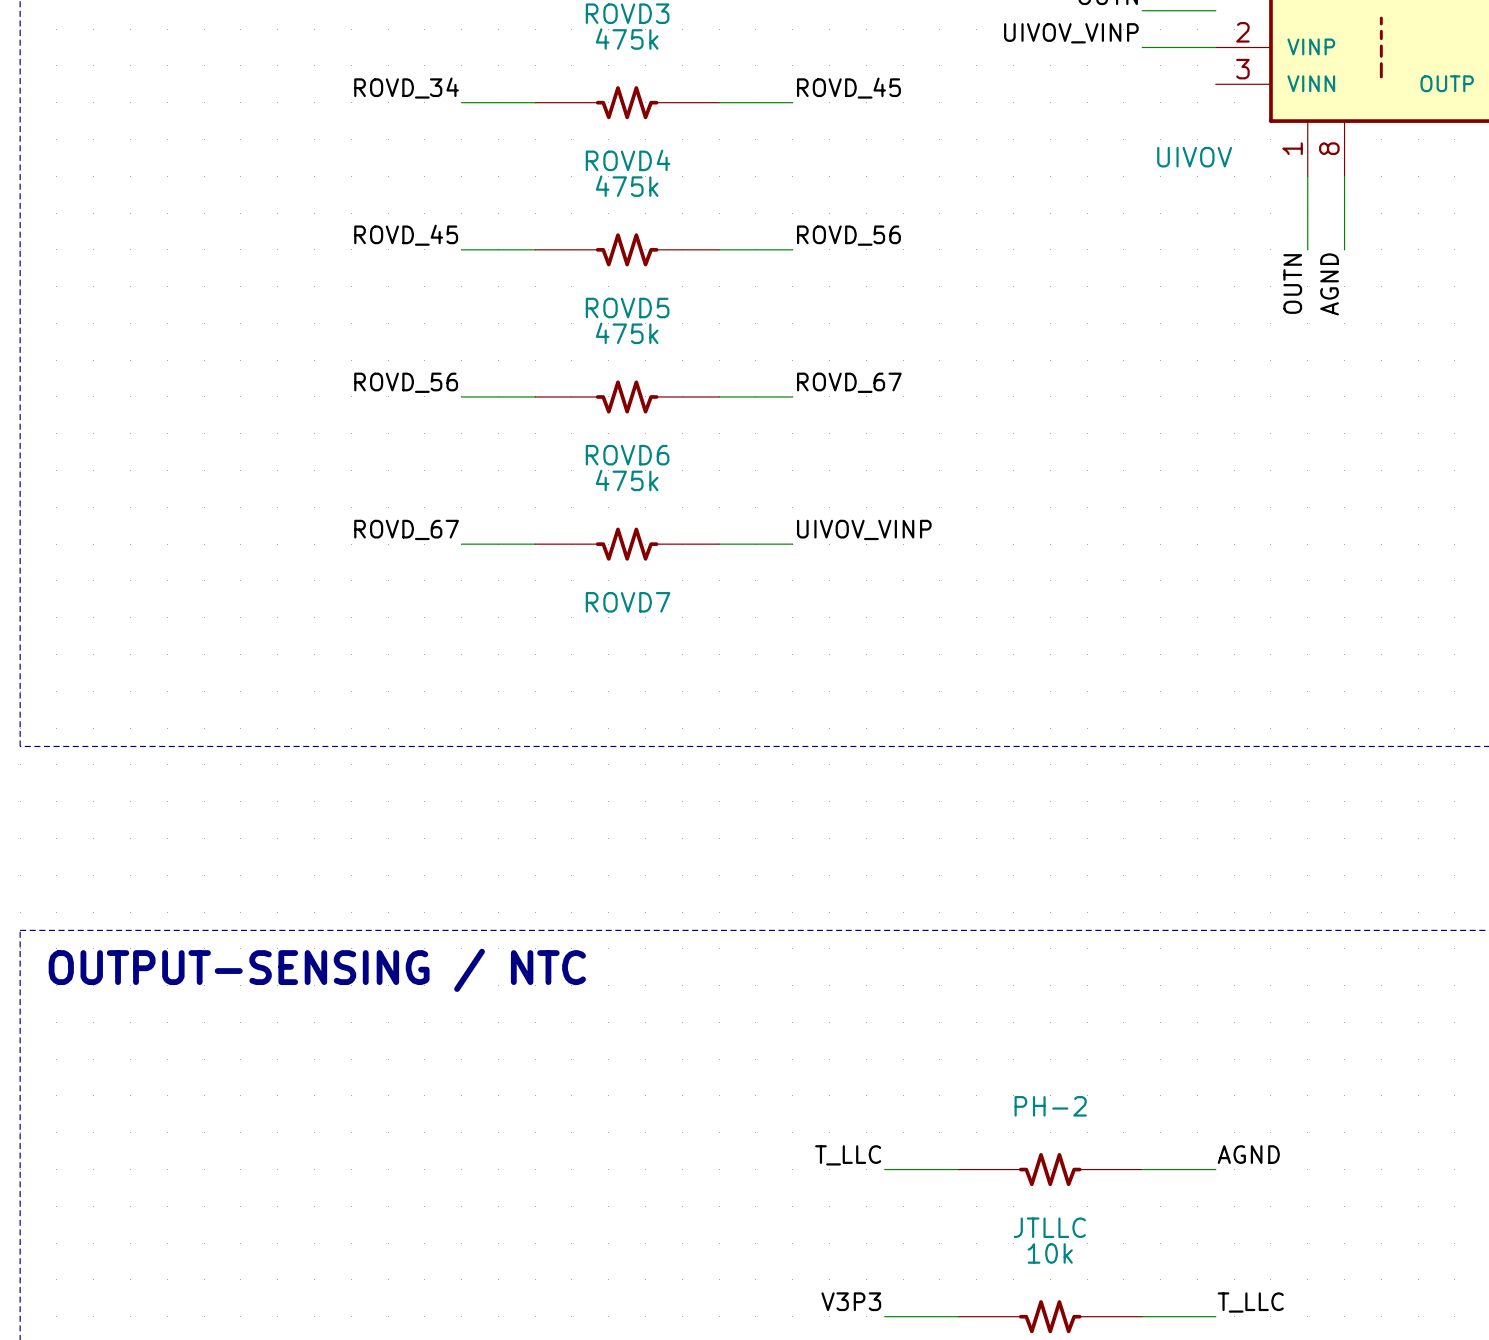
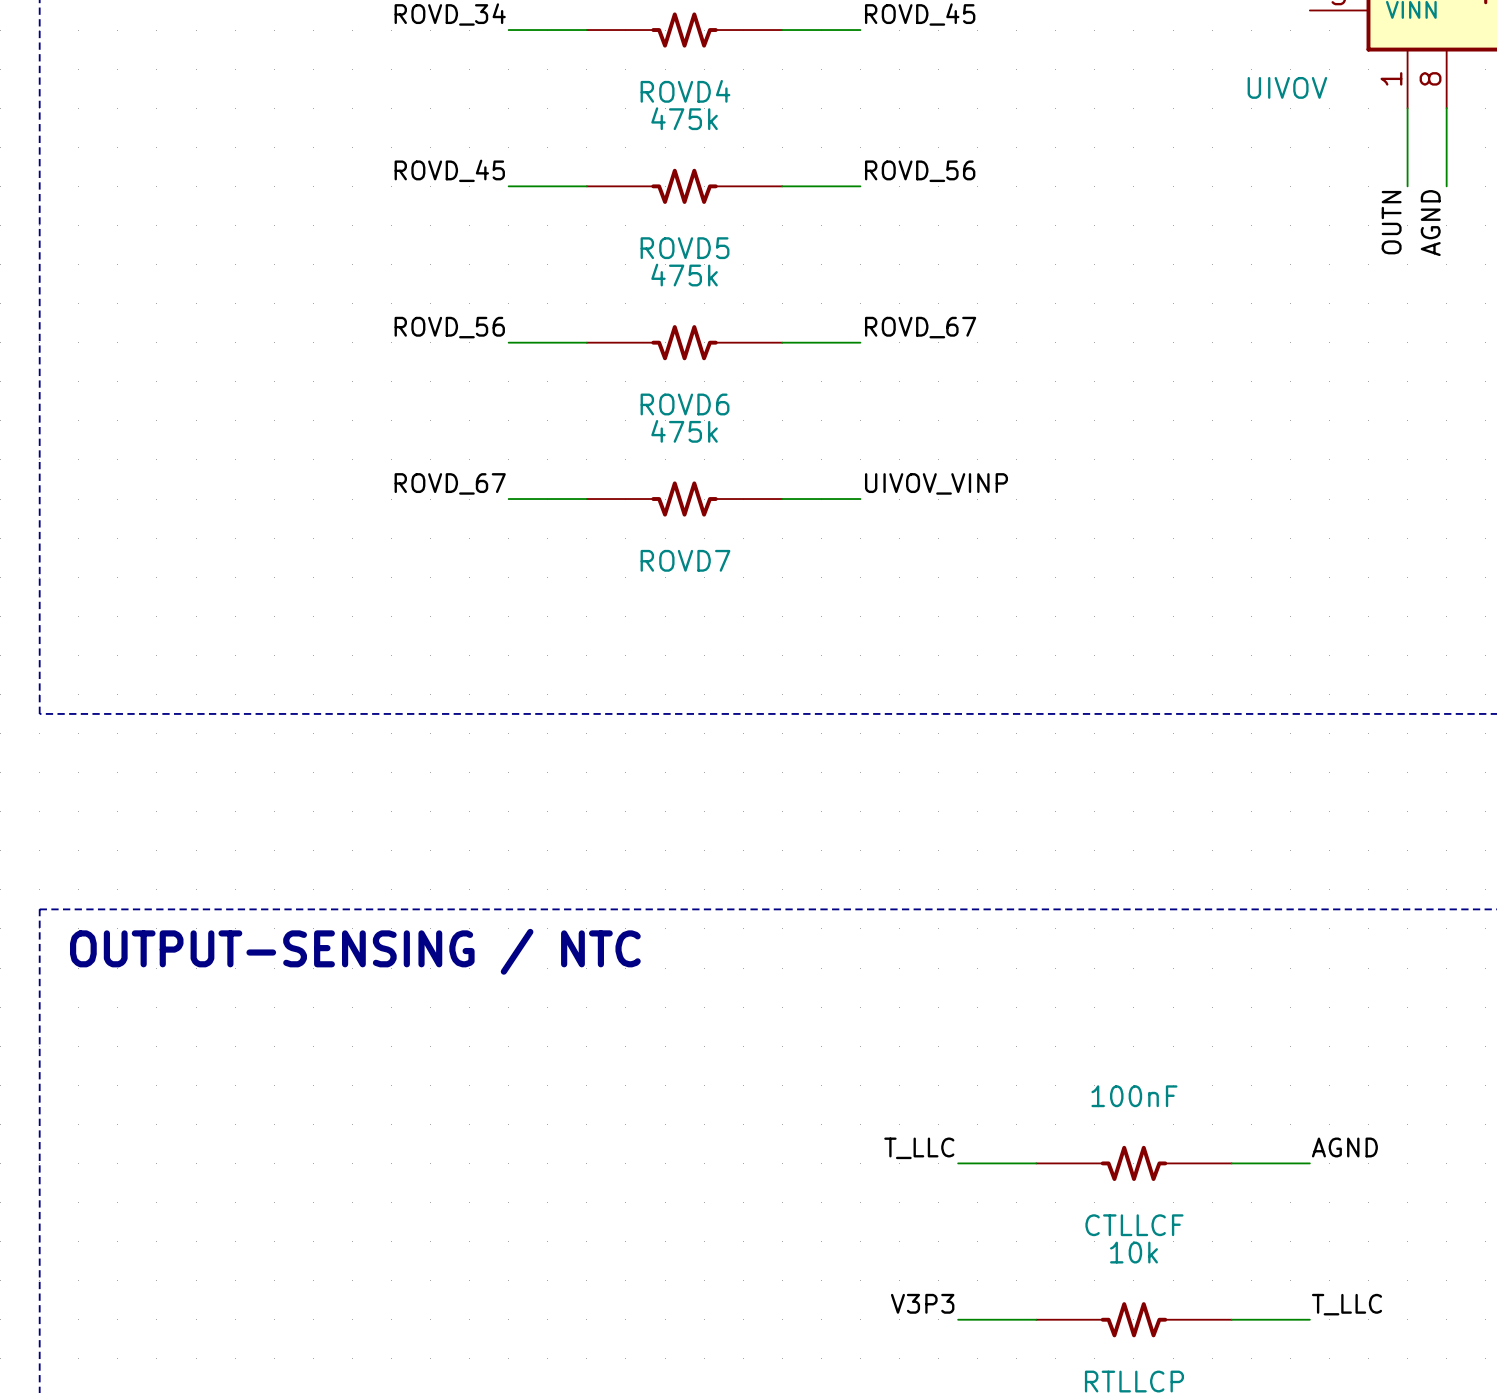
JTLLC value: PH-2 (1050, 1106) -> 100nF (1134, 1096)
JTLLC name: JTLLC (1049, 1227) -> CTLLCF (1134, 1225)

